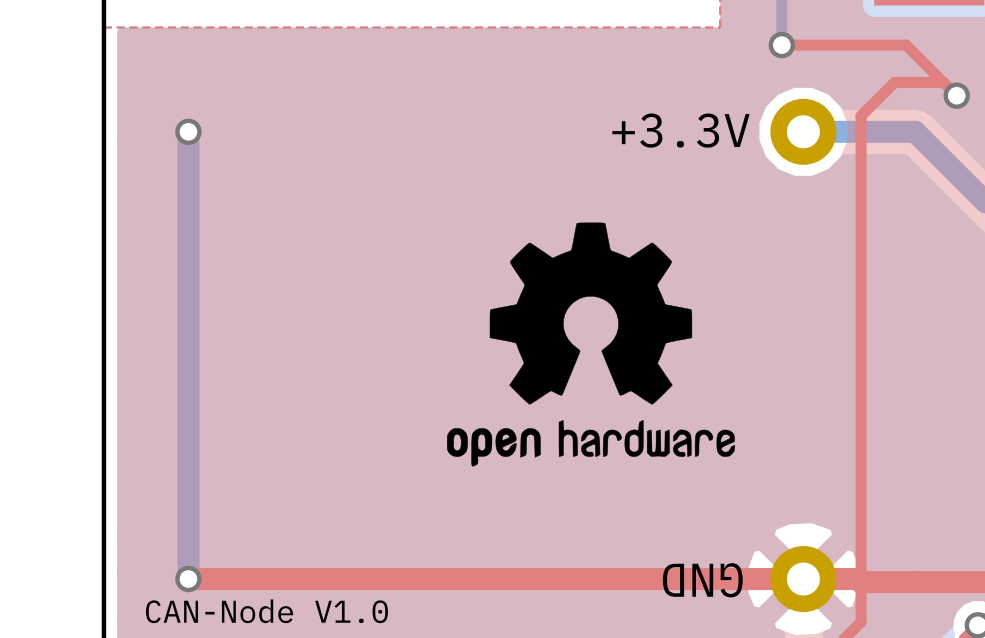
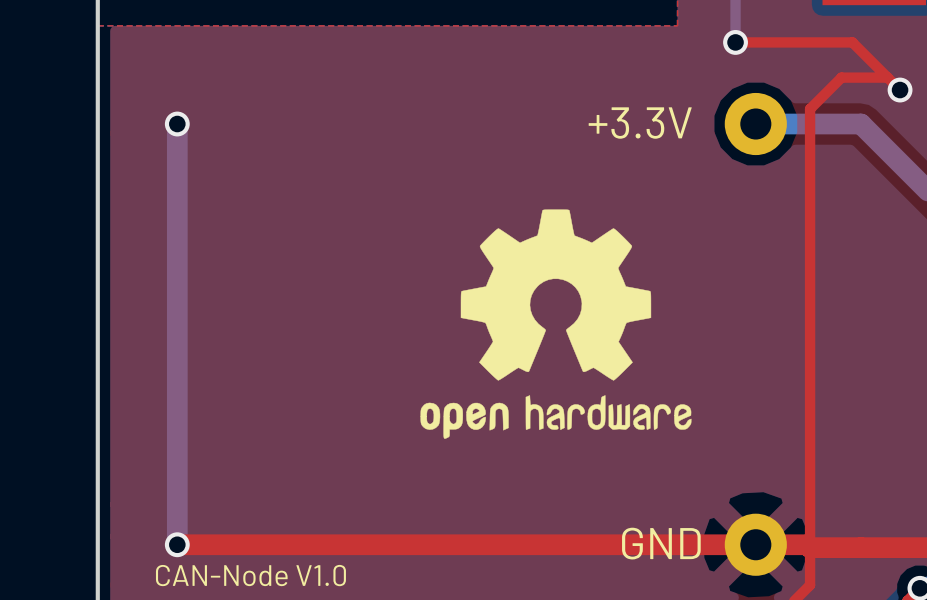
text rotation: 0° (702, 580) -> 180° (661, 543)

